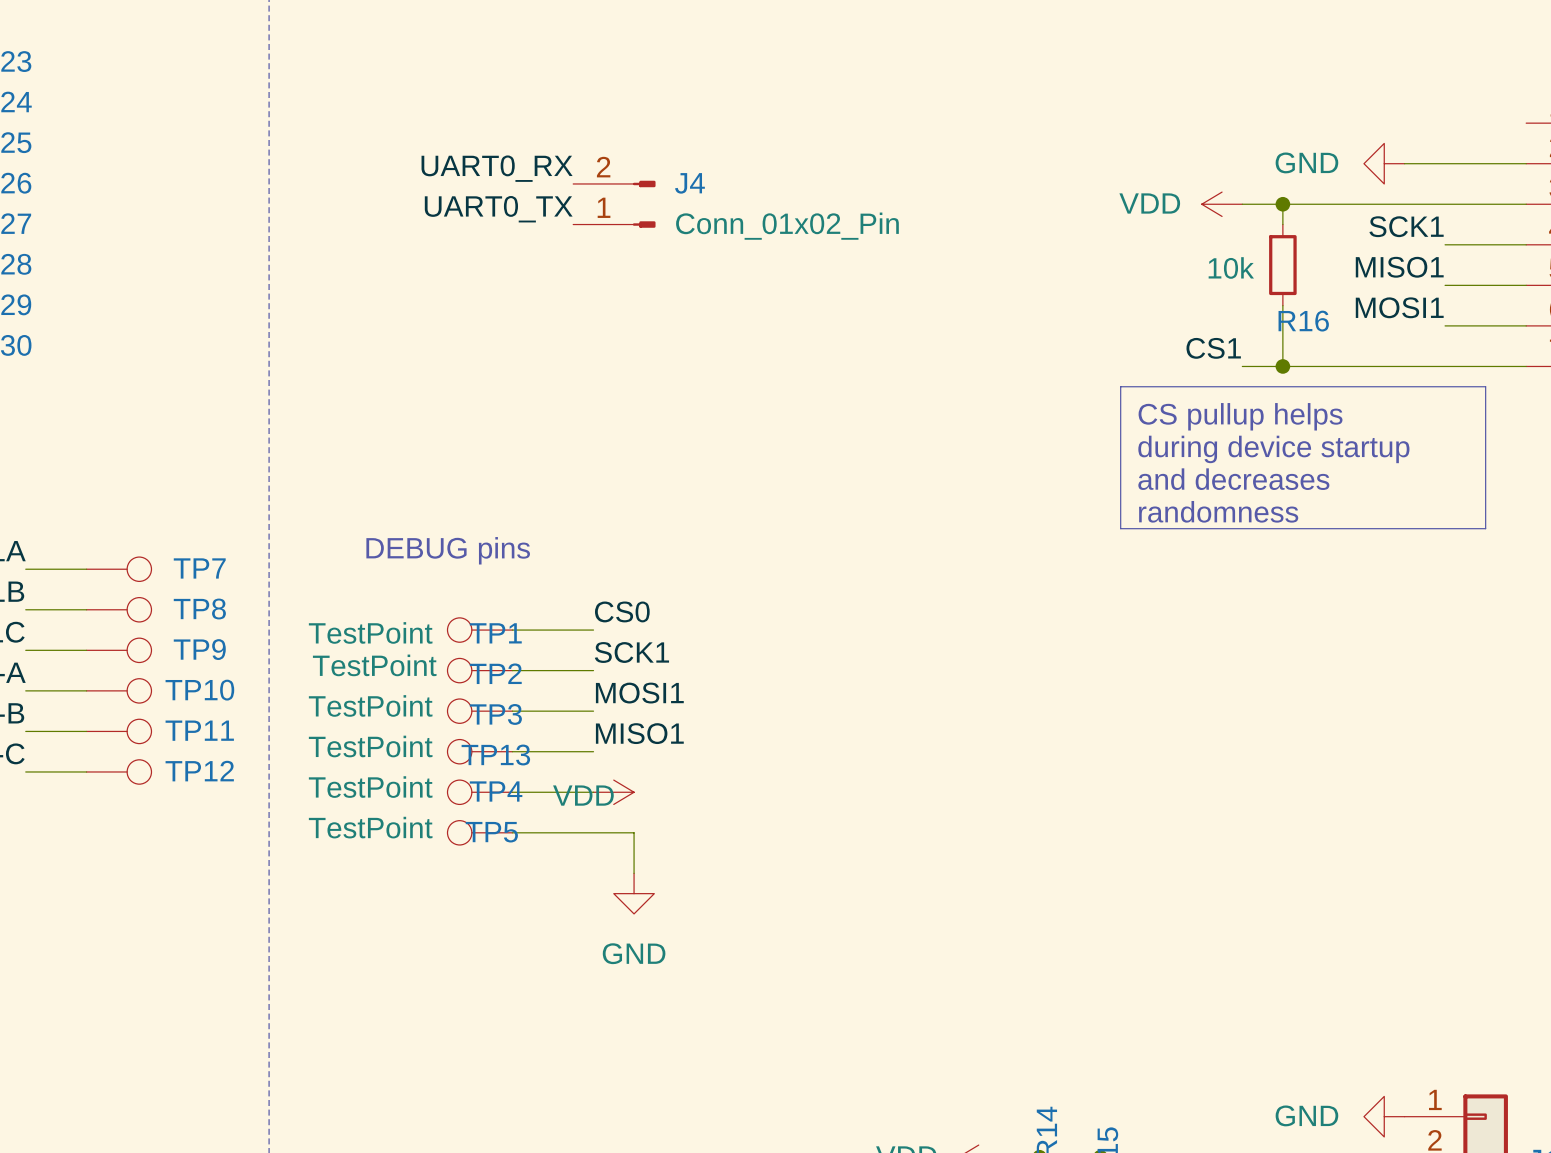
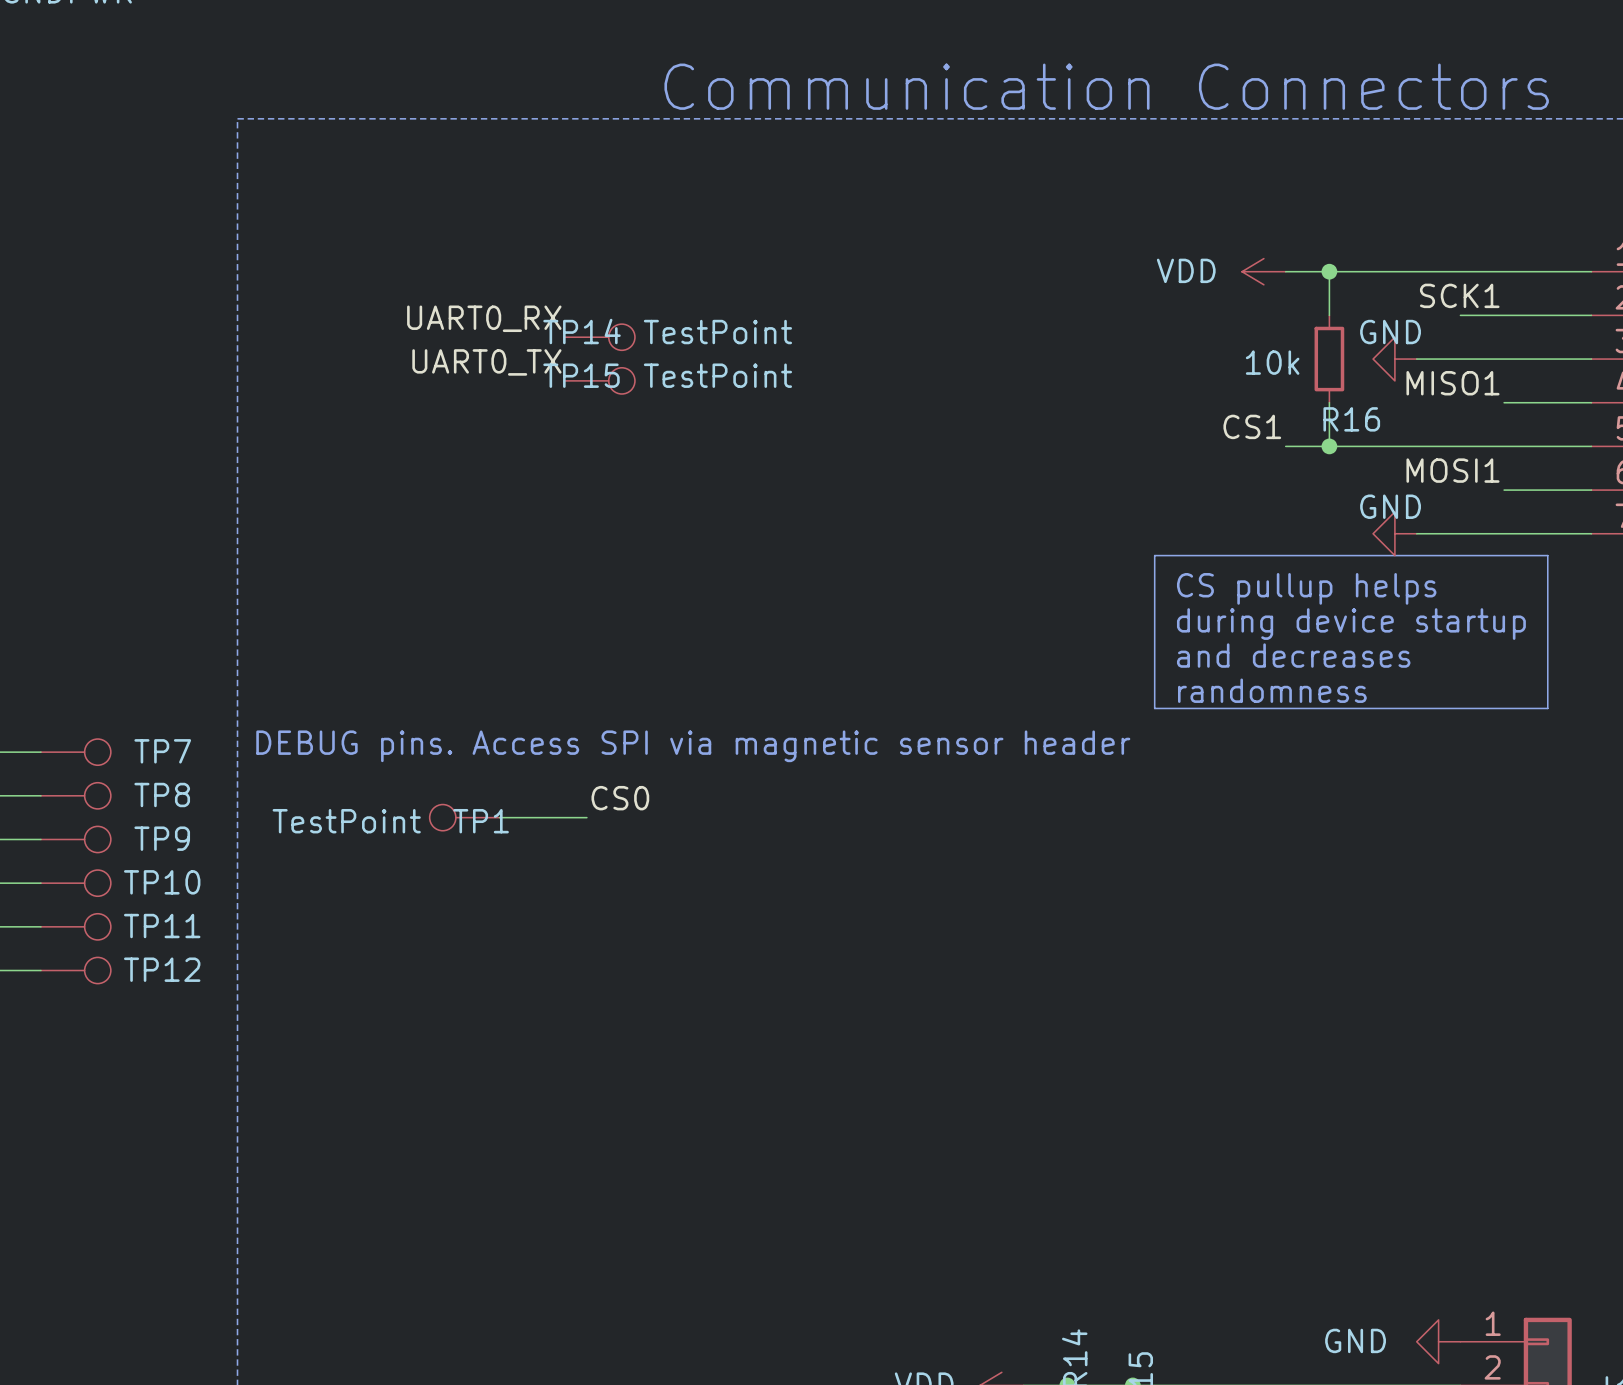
wire: none -> (1285, 271) (1591, 271)
wire: none -> (1329, 271) (1329, 315)
junction: none -> (1329, 271)
label: none -> SCK1 (1459, 295)
power symbol text position: GND (1306, 162) -> GND (1390, 332)
power symbol position: GND (1384, 163) -> GND (1394, 359)
TP14: none -> TestPoint (600, 337)
J4: Conn_01x02_Pin (614, 204) -> none
power symbol position: VDD (1222, 204) -> VDD (1263, 271)
wire: (1242, 204) (1363, 204) -> none
wire: (1282, 204) (1282, 224) -> none
junction: (1282, 204) -> none
TP15: none -> TestPoint (600, 380)
label: SCK1 (1406, 226) -> MISO1 (1452, 383)
wire: none -> (1329, 402) (1329, 446)
R16 position: (1282, 265) -> (1329, 359)
label: MISO1 (1399, 267) -> none
wire: none -> (1285, 446) (1504, 446)
junction: none -> (1329, 446)
wire: (1282, 305) (1282, 366) -> none
label position: CS1 (1213, 348) -> CS1 (1252, 426)
wire: (1242, 366) (1363, 366) -> none
junction: (1282, 366) -> none
power symbol: none -> GND (1394, 533)
text: DEBUG pins (448, 550) -> none
text: none -> DEBUG pins. Access SPI via magnetic sensor header (693, 746)
label: SCK1 (631, 652) -> none
TP2: TestPoint (479, 670) -> none
wire: (512, 670) (593, 670) -> none
label: MOSI1 (639, 693) -> none
TP3: TestPoint (479, 711) -> none
wire: (512, 711) (593, 711) -> none
label: MISO1 (639, 733) -> none
TP13: TestPoint (479, 751) -> none
wire: (512, 751) (593, 751) -> none
TP4: TestPoint (479, 792) -> none
wire: (512, 792) (593, 792) -> none
power symbol: VDD (613, 792) -> none
TP5: TestPoint (479, 832) -> none
wire: (512, 832) (634, 832) (634, 873) -> none
power symbol: GND (634, 893) -> none

